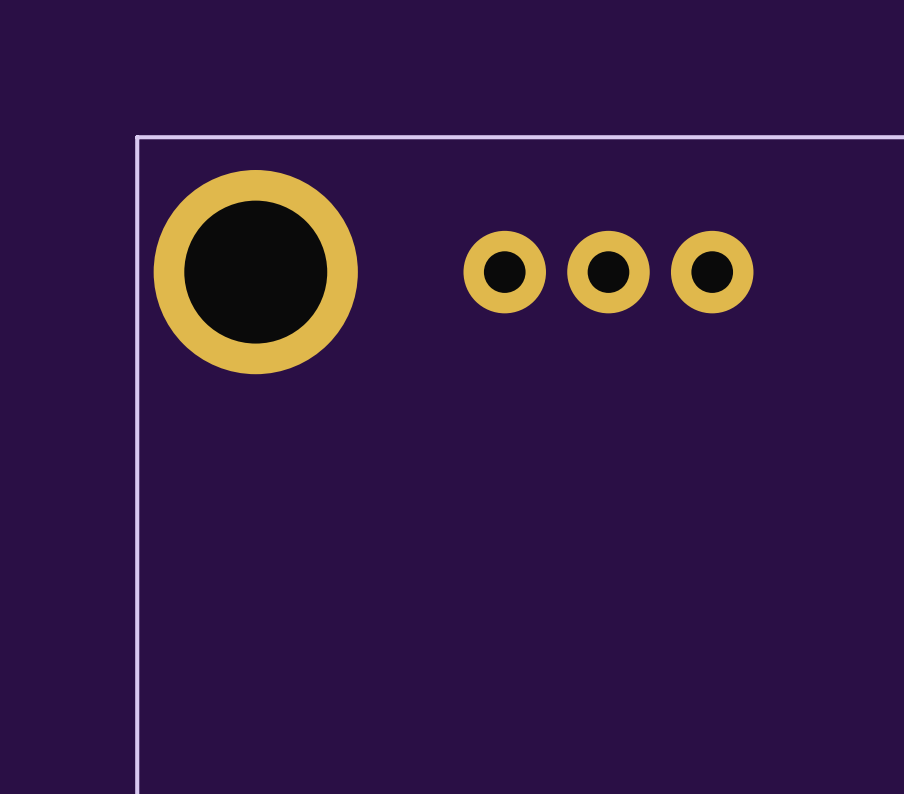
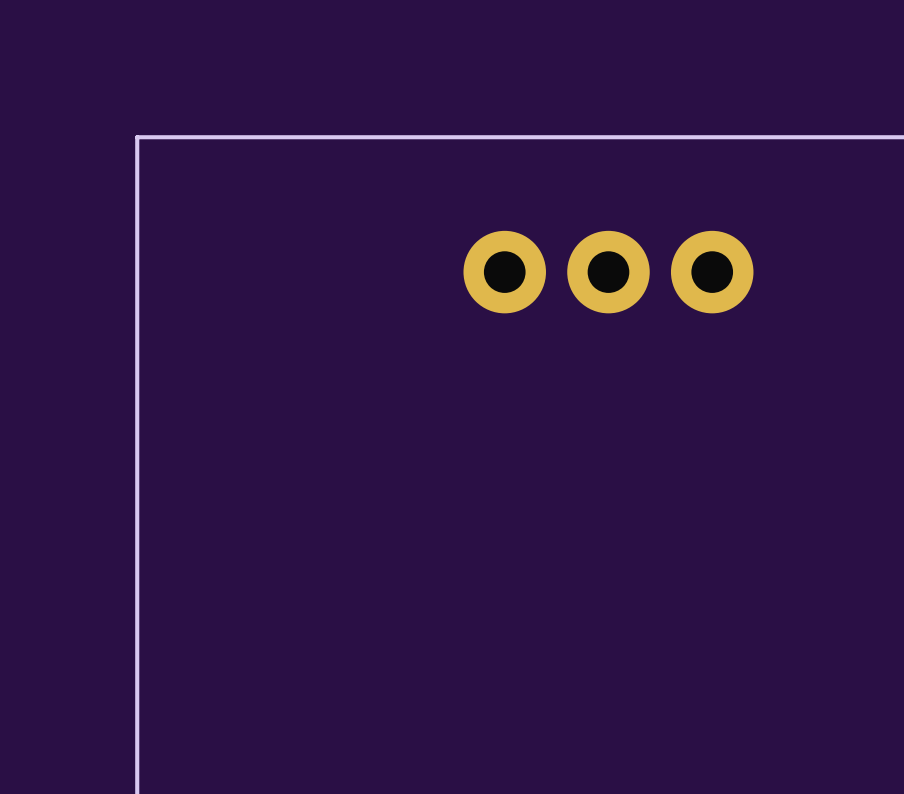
part: (255, 272) -> none

